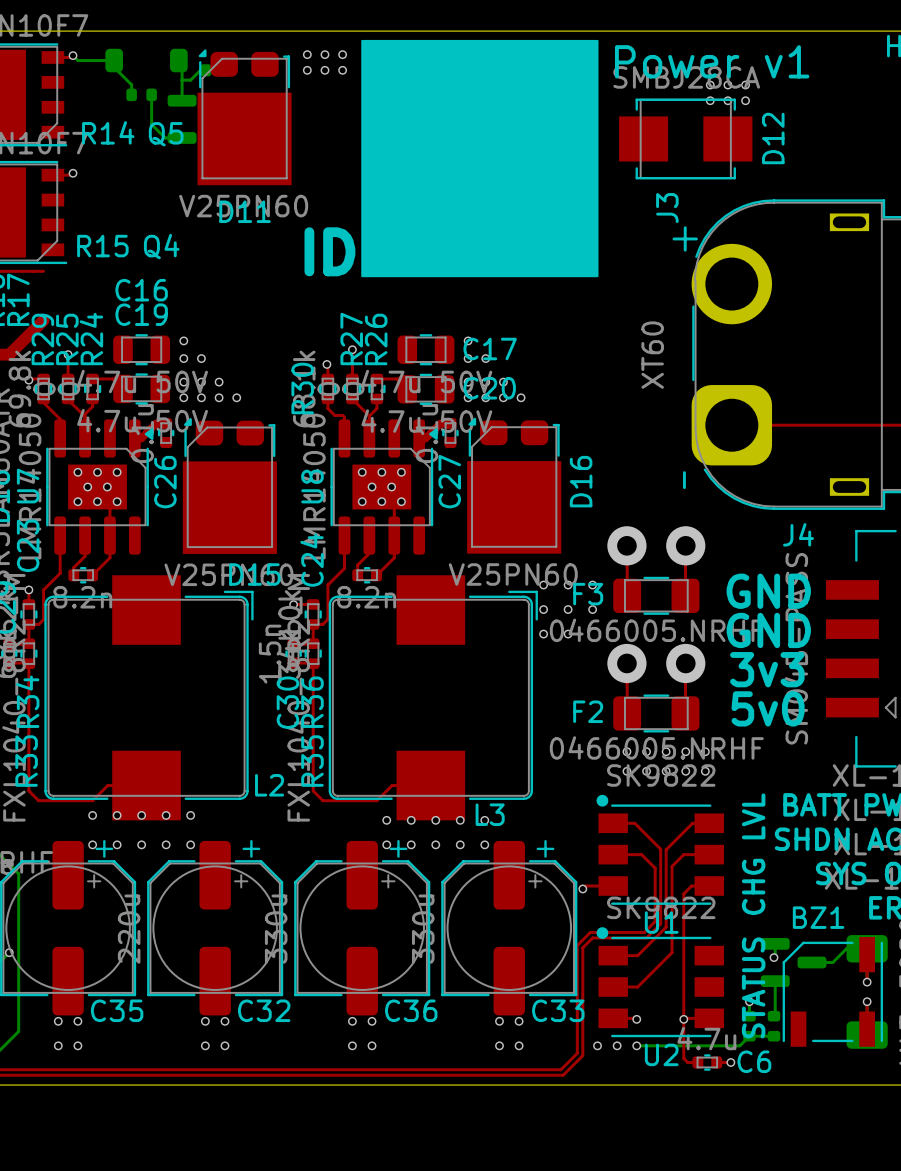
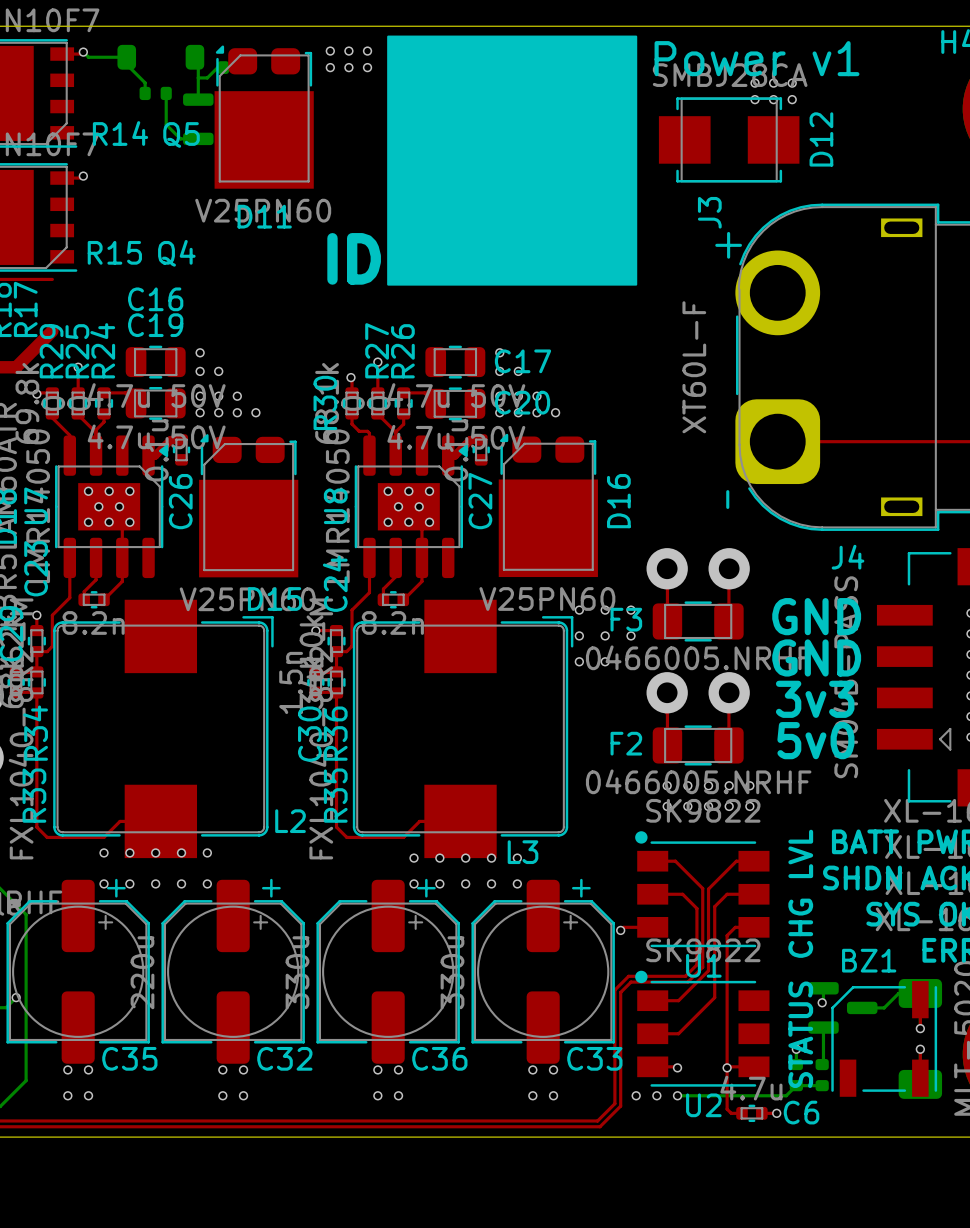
J3 value: XT60 (652, 355) -> XT60L-F (694, 367)

